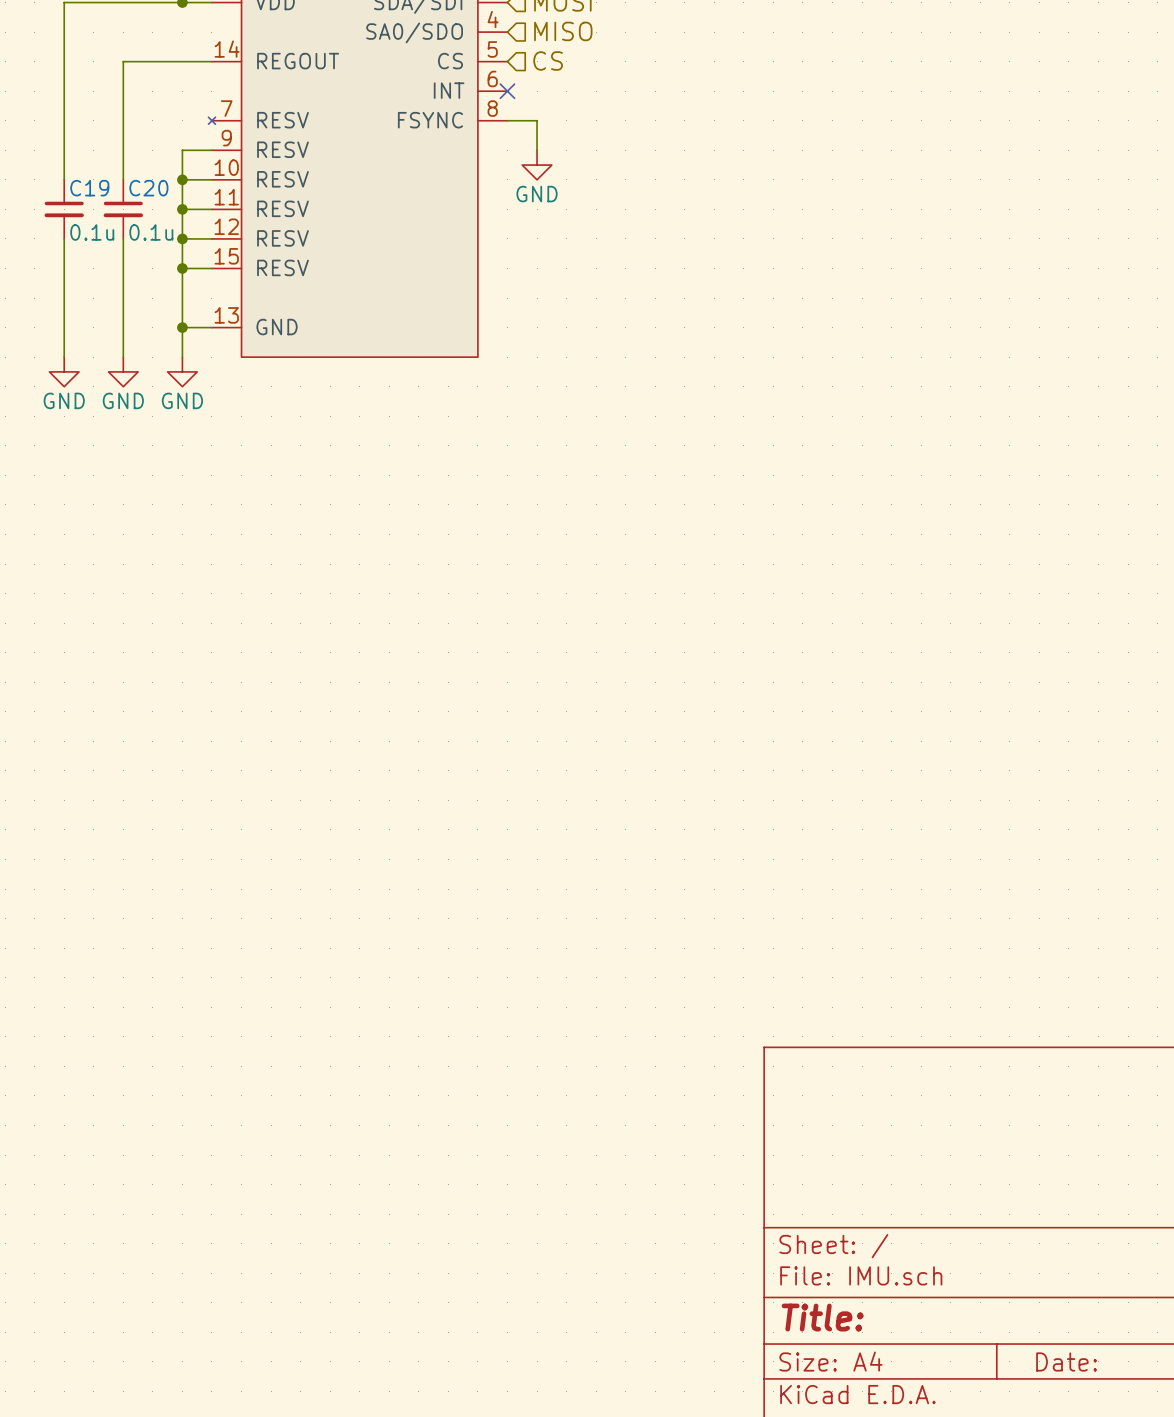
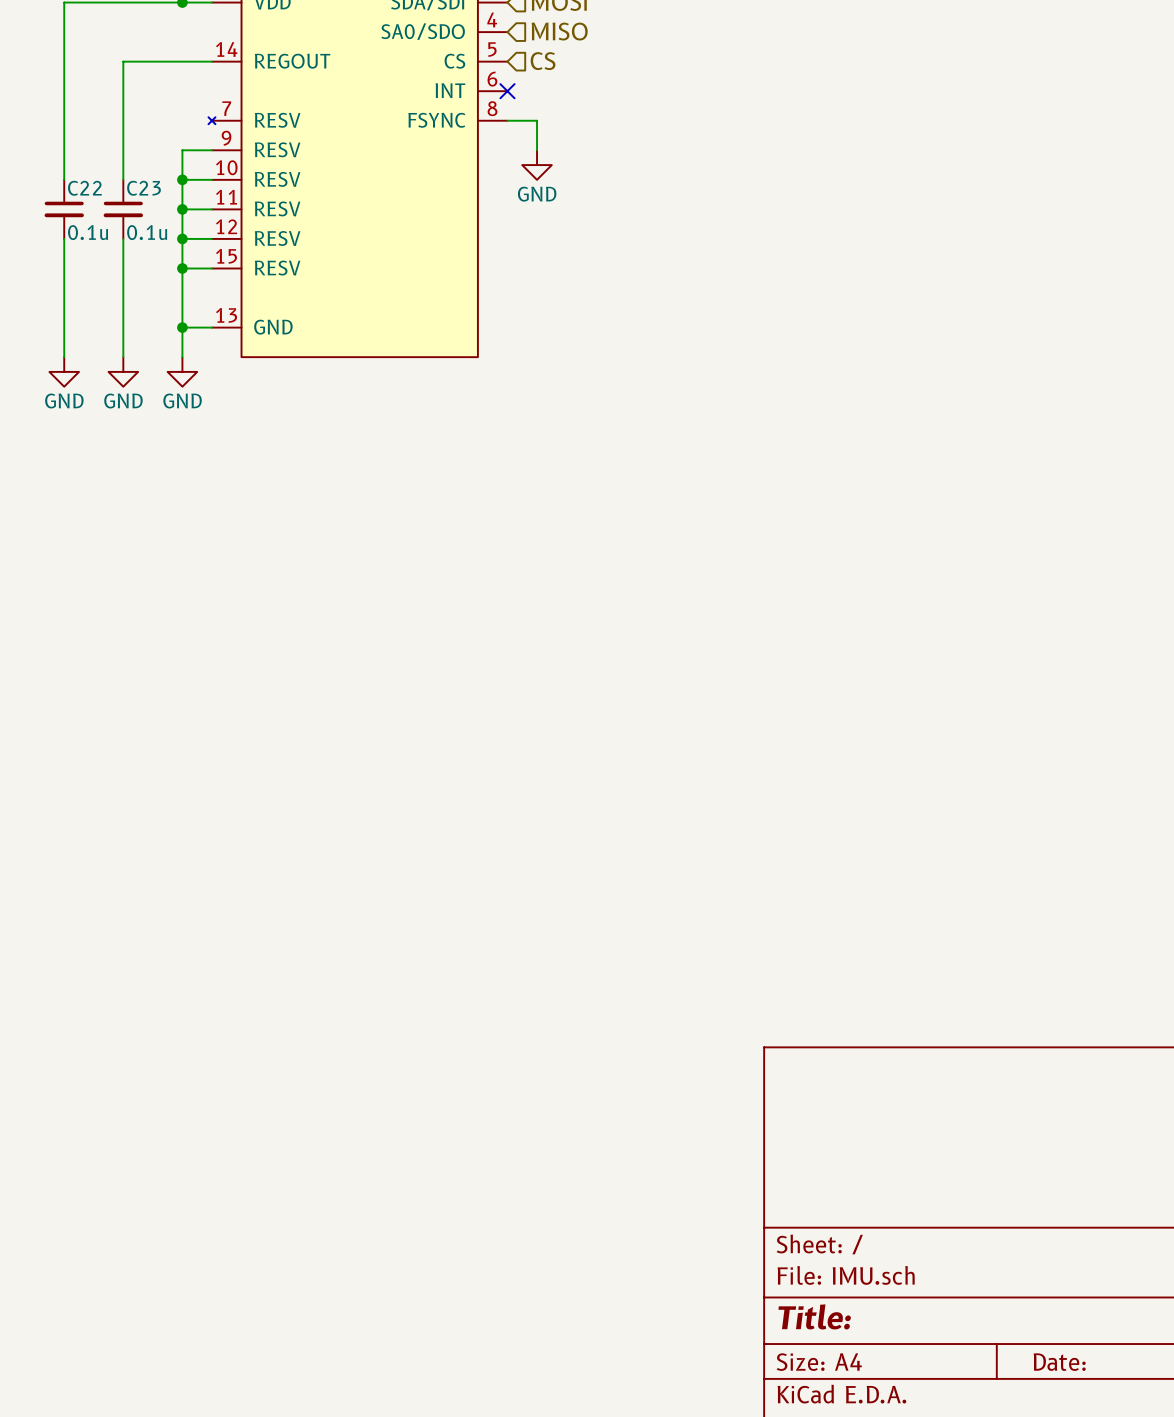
C19 name: C19 (89, 188) -> C22 (84, 188)
C20 name: C20 (148, 188) -> C23 (144, 188)

